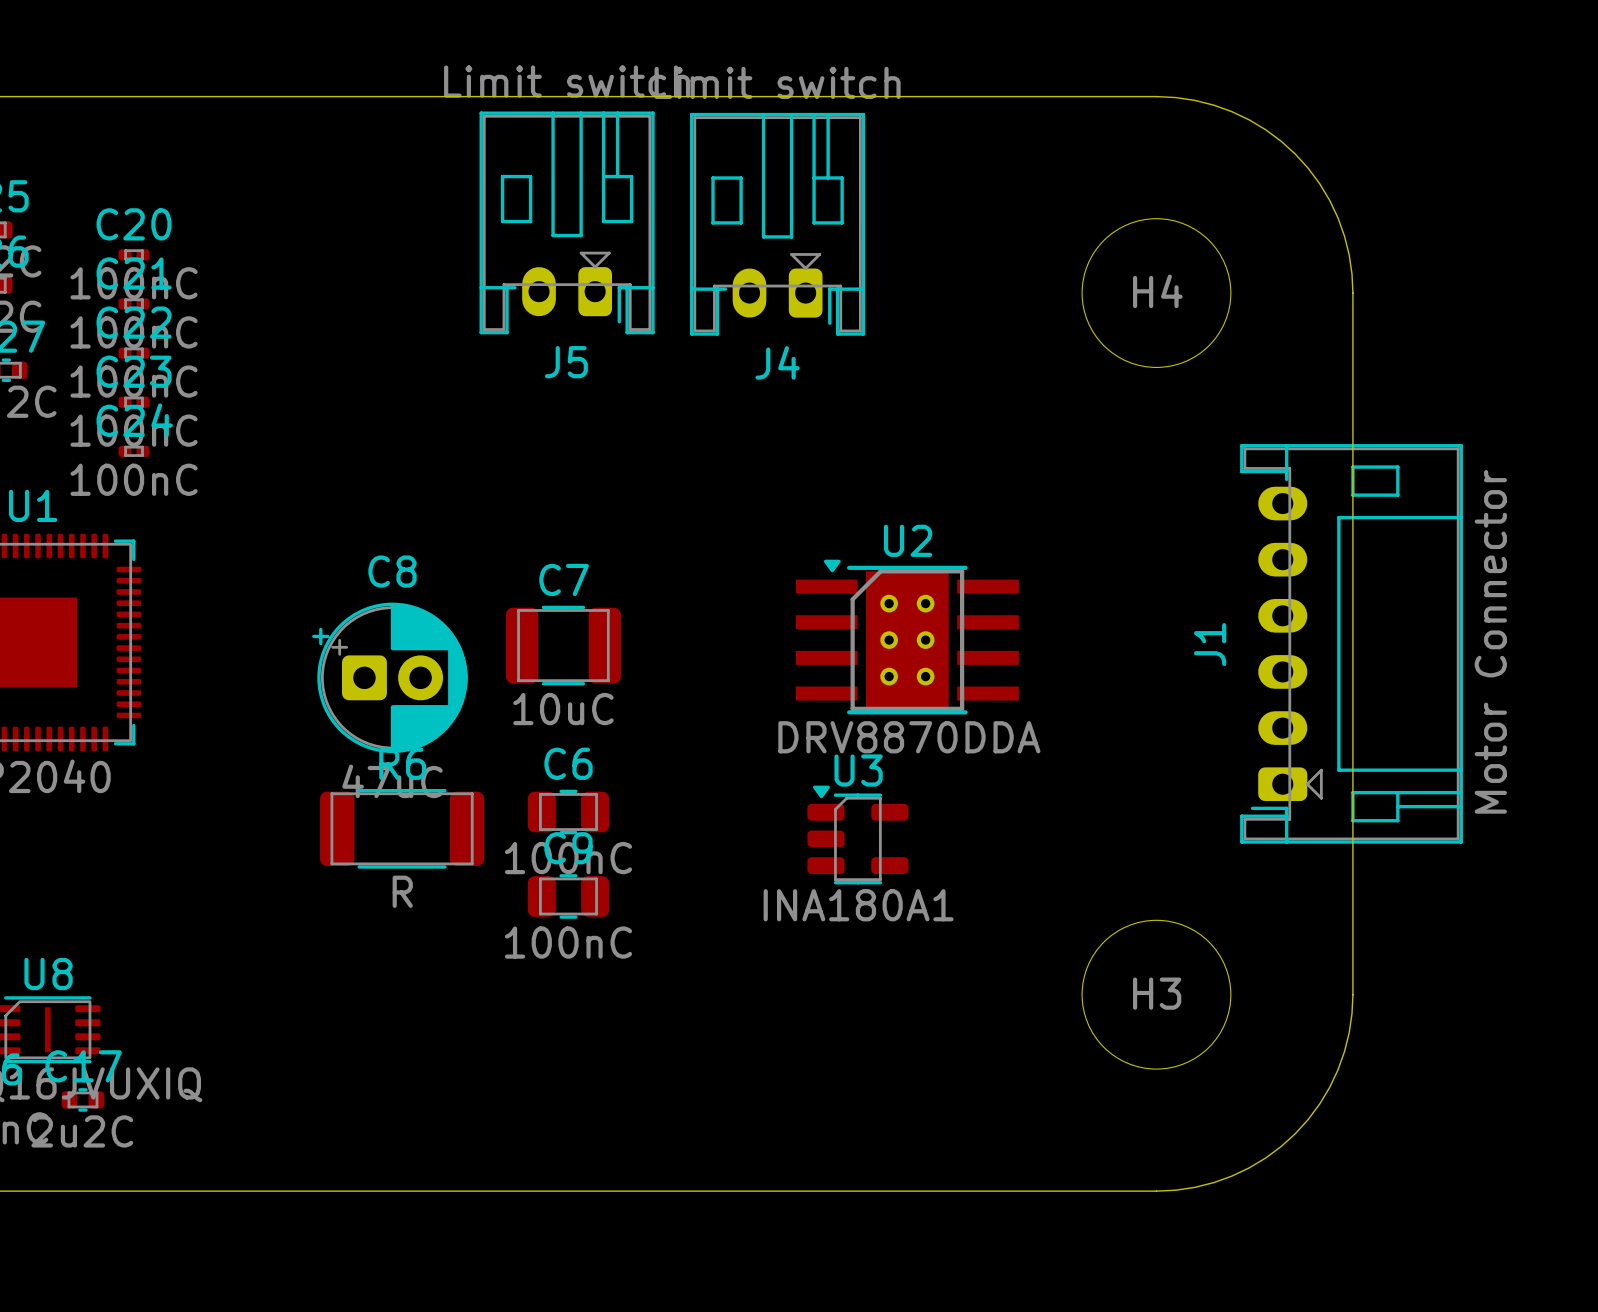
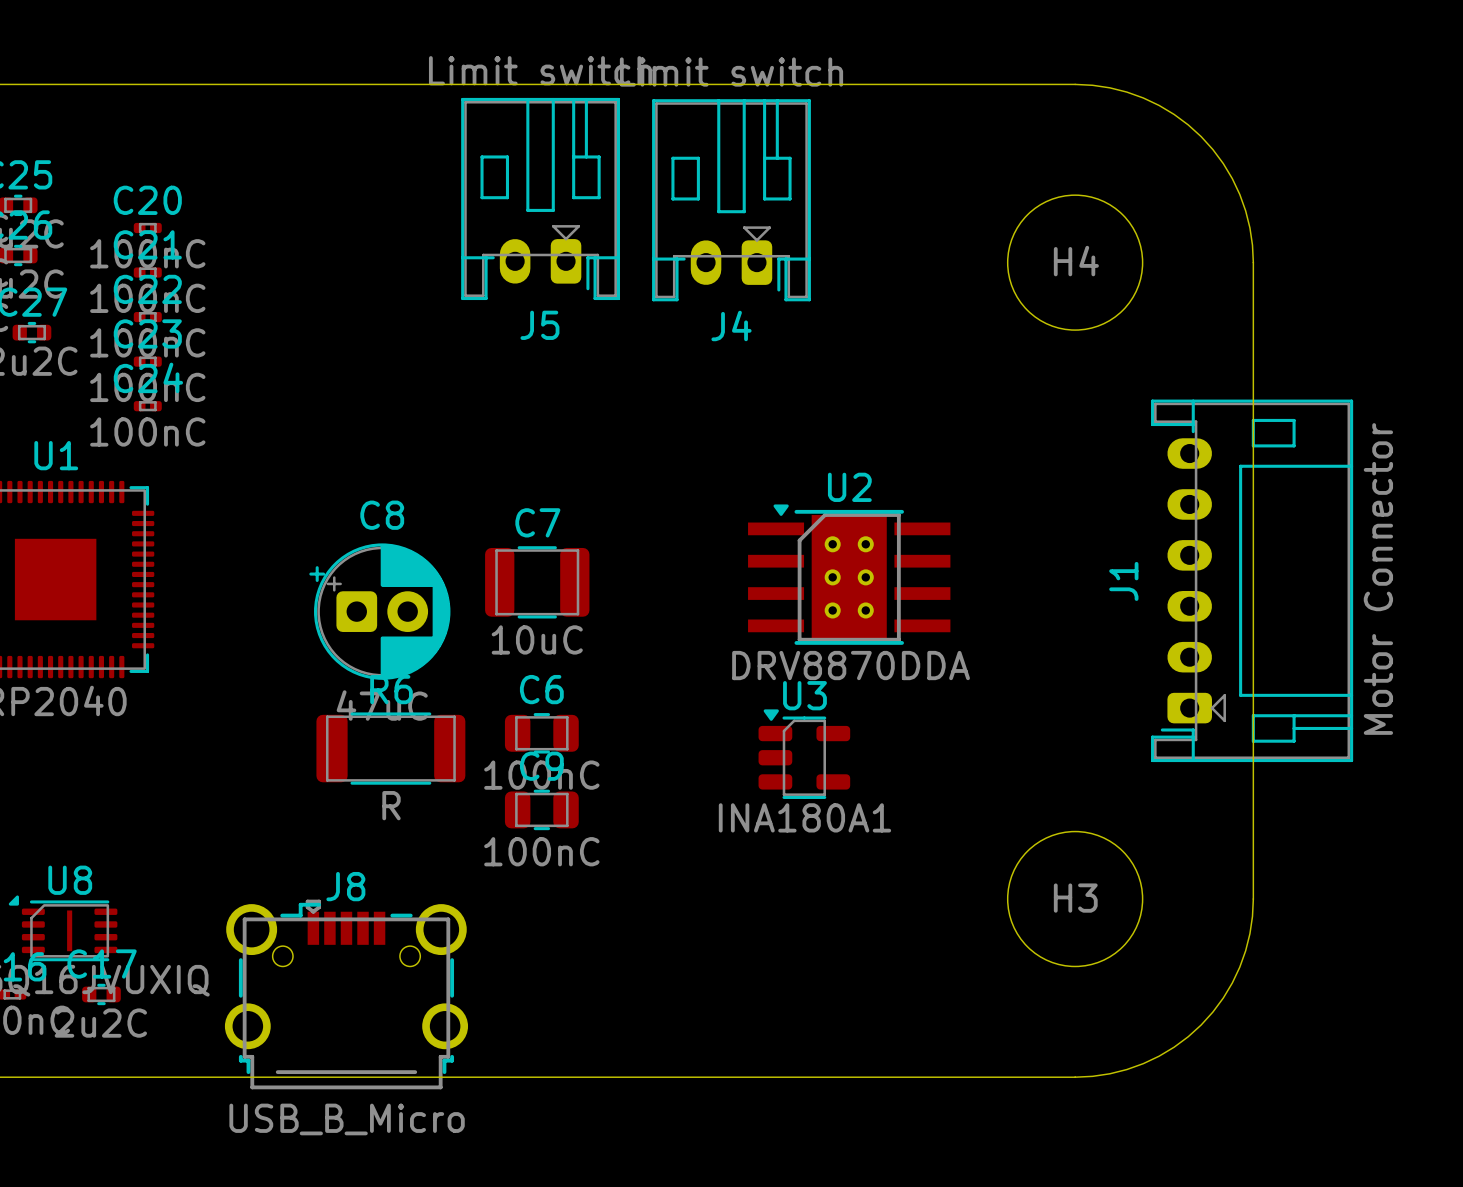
J8: none -> USB_B_Micro (346, 994)

